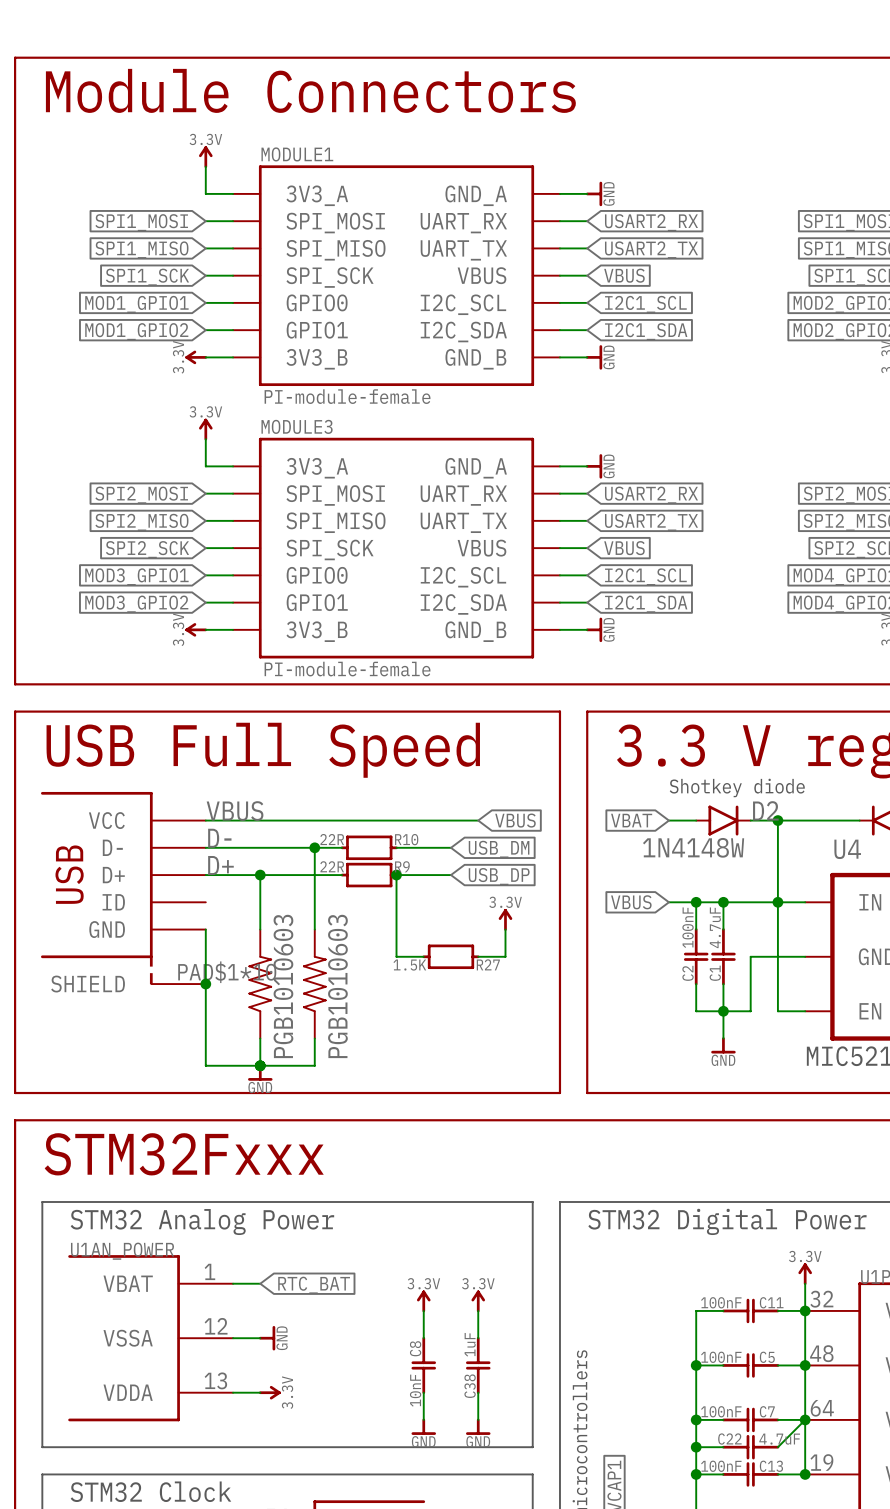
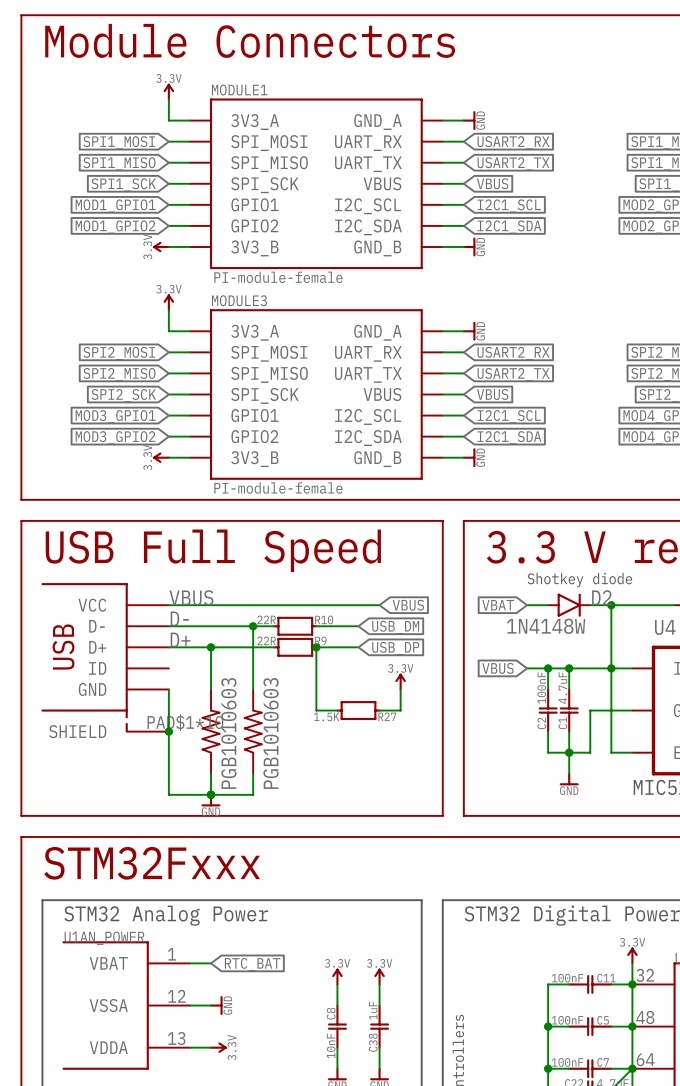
MODULE1 pin name: GPIO0 (317, 302) -> GPIO1 (255, 204)
MODULE1 pin name: GPIO1 (317, 330) -> GPIO2 (254, 225)
MODULE3 pin name: GPIO0 (317, 575) -> GPIO1 (255, 415)
MODULE3 pin name: GPIO1 (317, 602) -> GPIO2 (254, 436)

